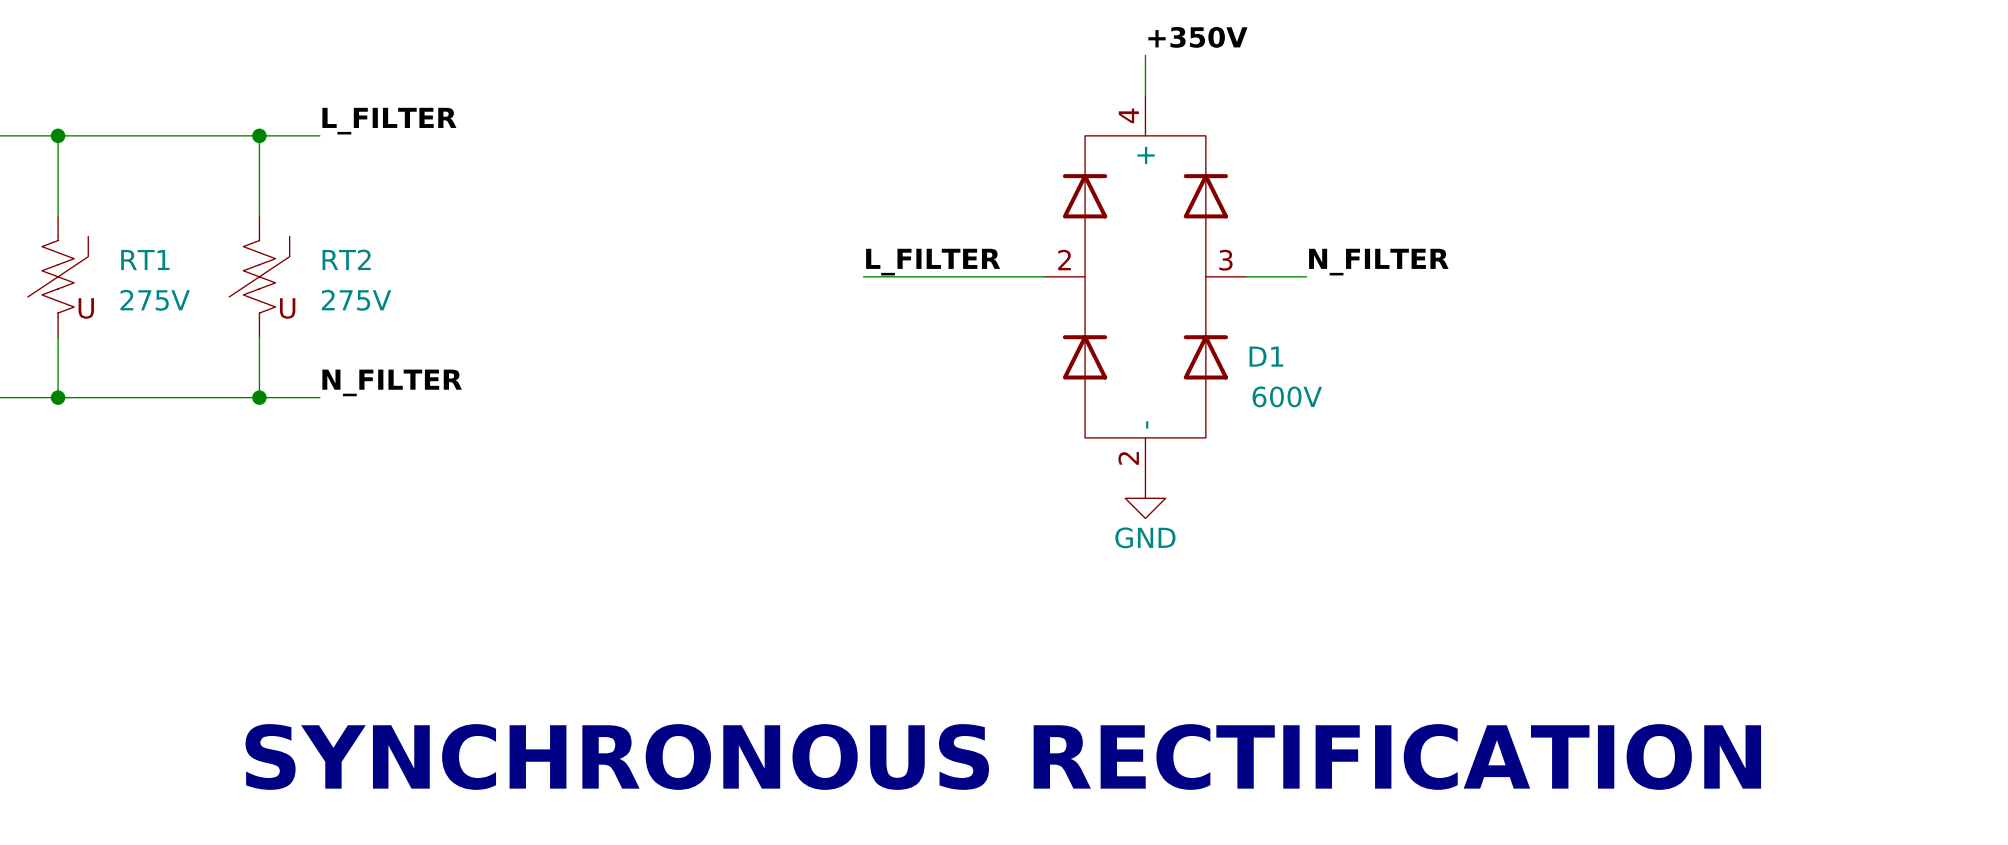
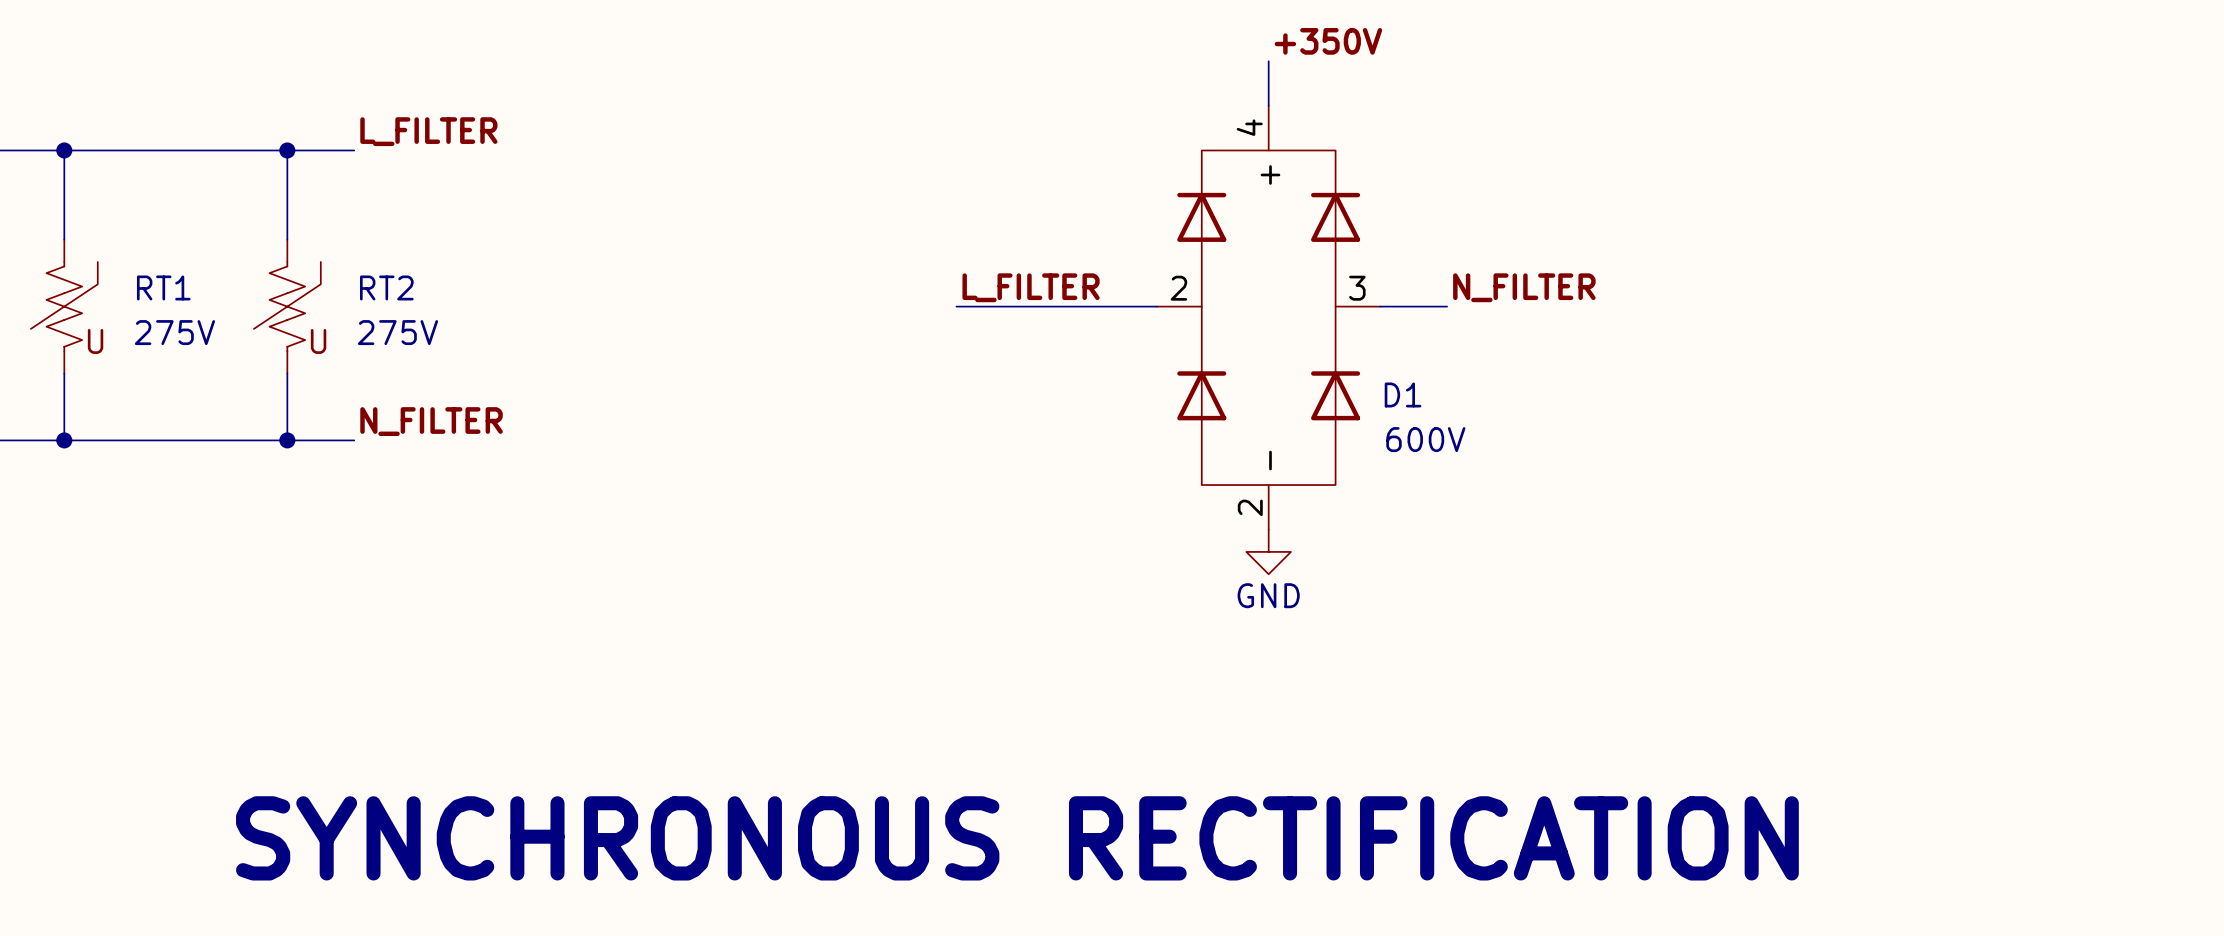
text position: SYNCHRONOUS RECTIFICATION (1003, 756) -> SYNCHRONOUS RECTIFICATION (1017, 838)

